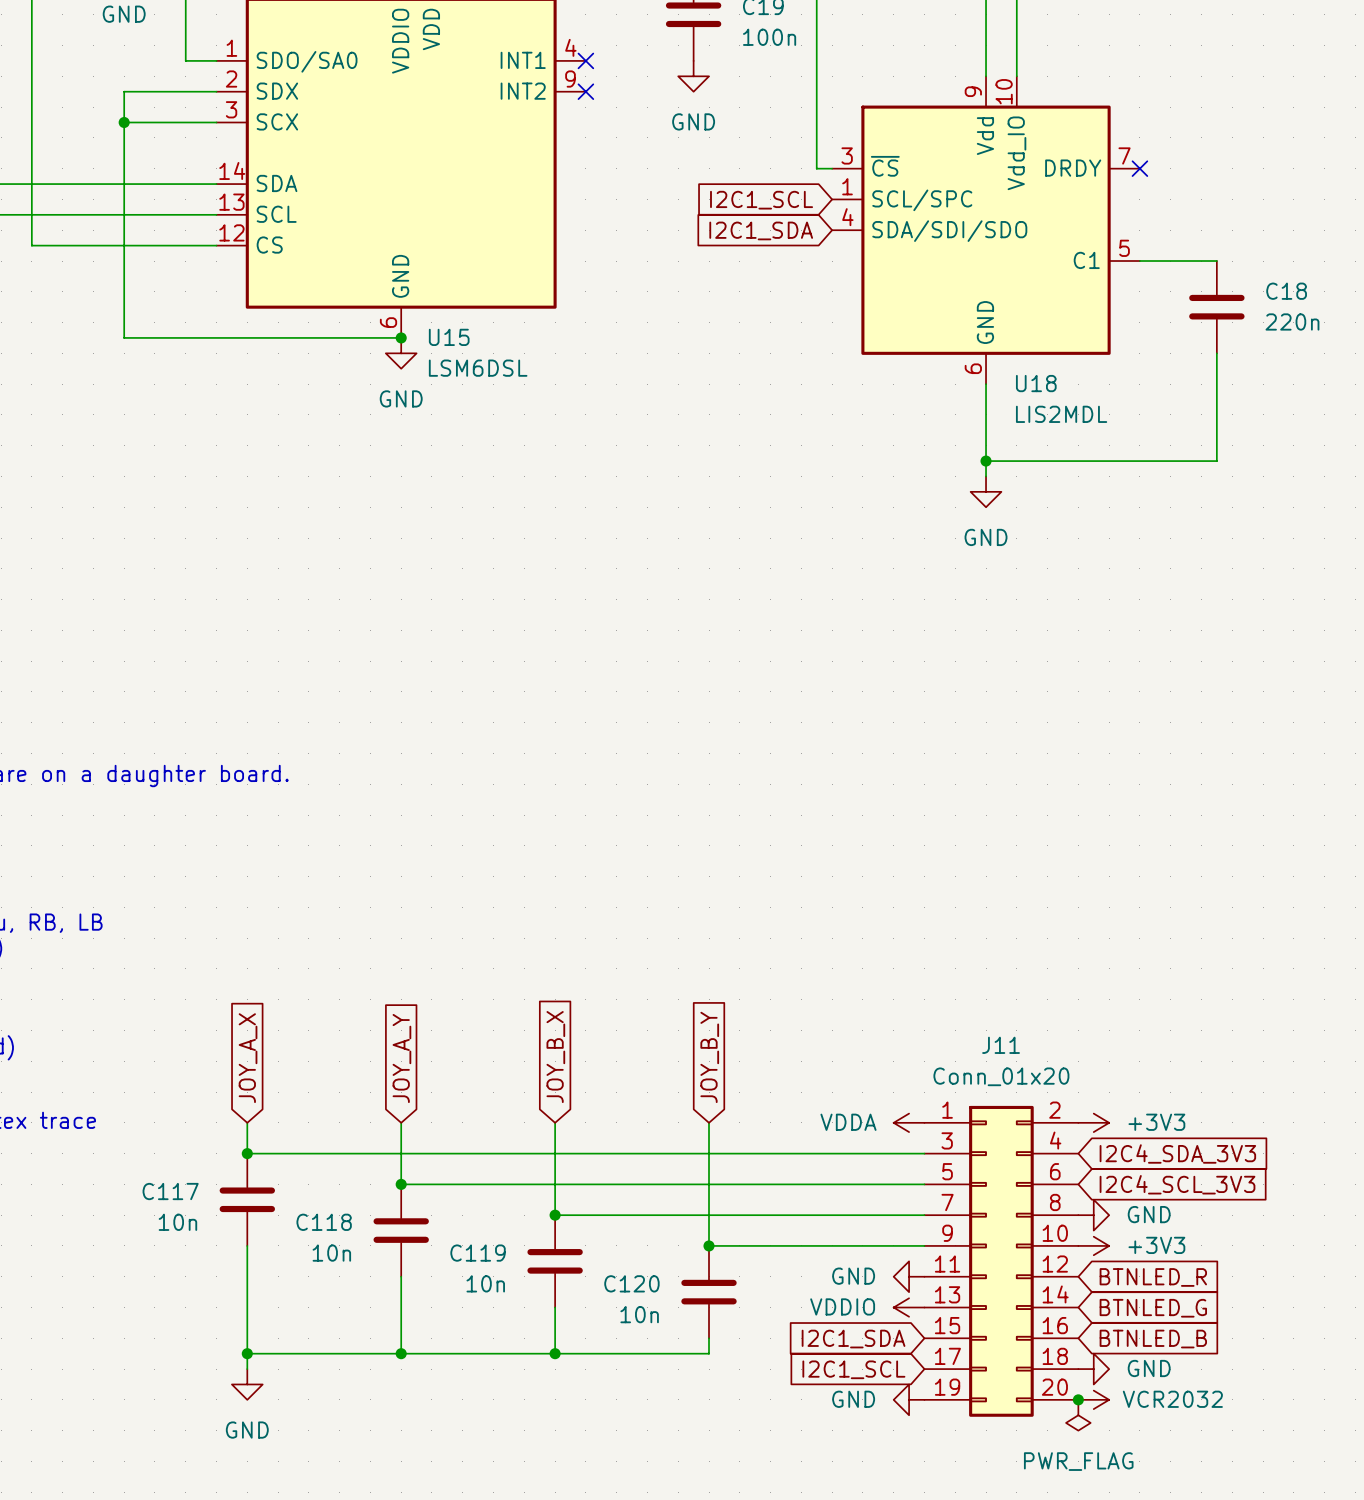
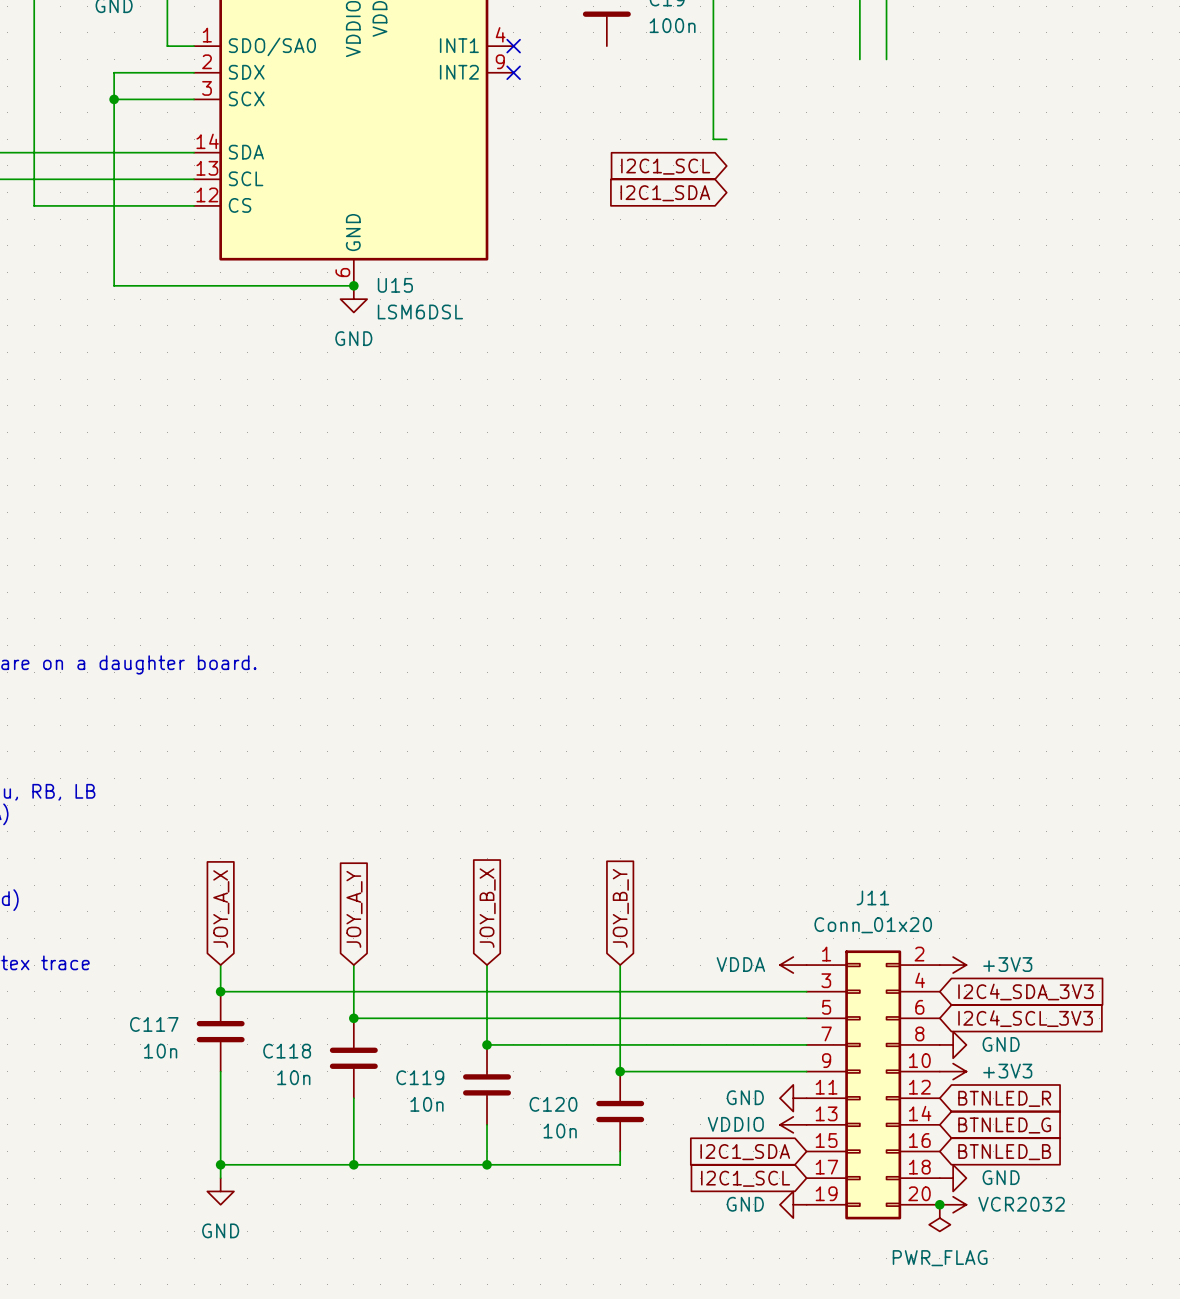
power symbol: GND (693, 76) -> none
no-connect mark: (1139, 168) -> none
U18: LIS2MDL (986, 230) -> none
wire: (1139, 261) (1216, 261) -> none
C18: 220n (1216, 307) -> none
wire: (1216, 353) (1216, 461) (986, 461) -> none
wire: (986, 384) (986, 476) -> none
junction: (986, 461) -> none
power symbol: GND (986, 491) -> none

